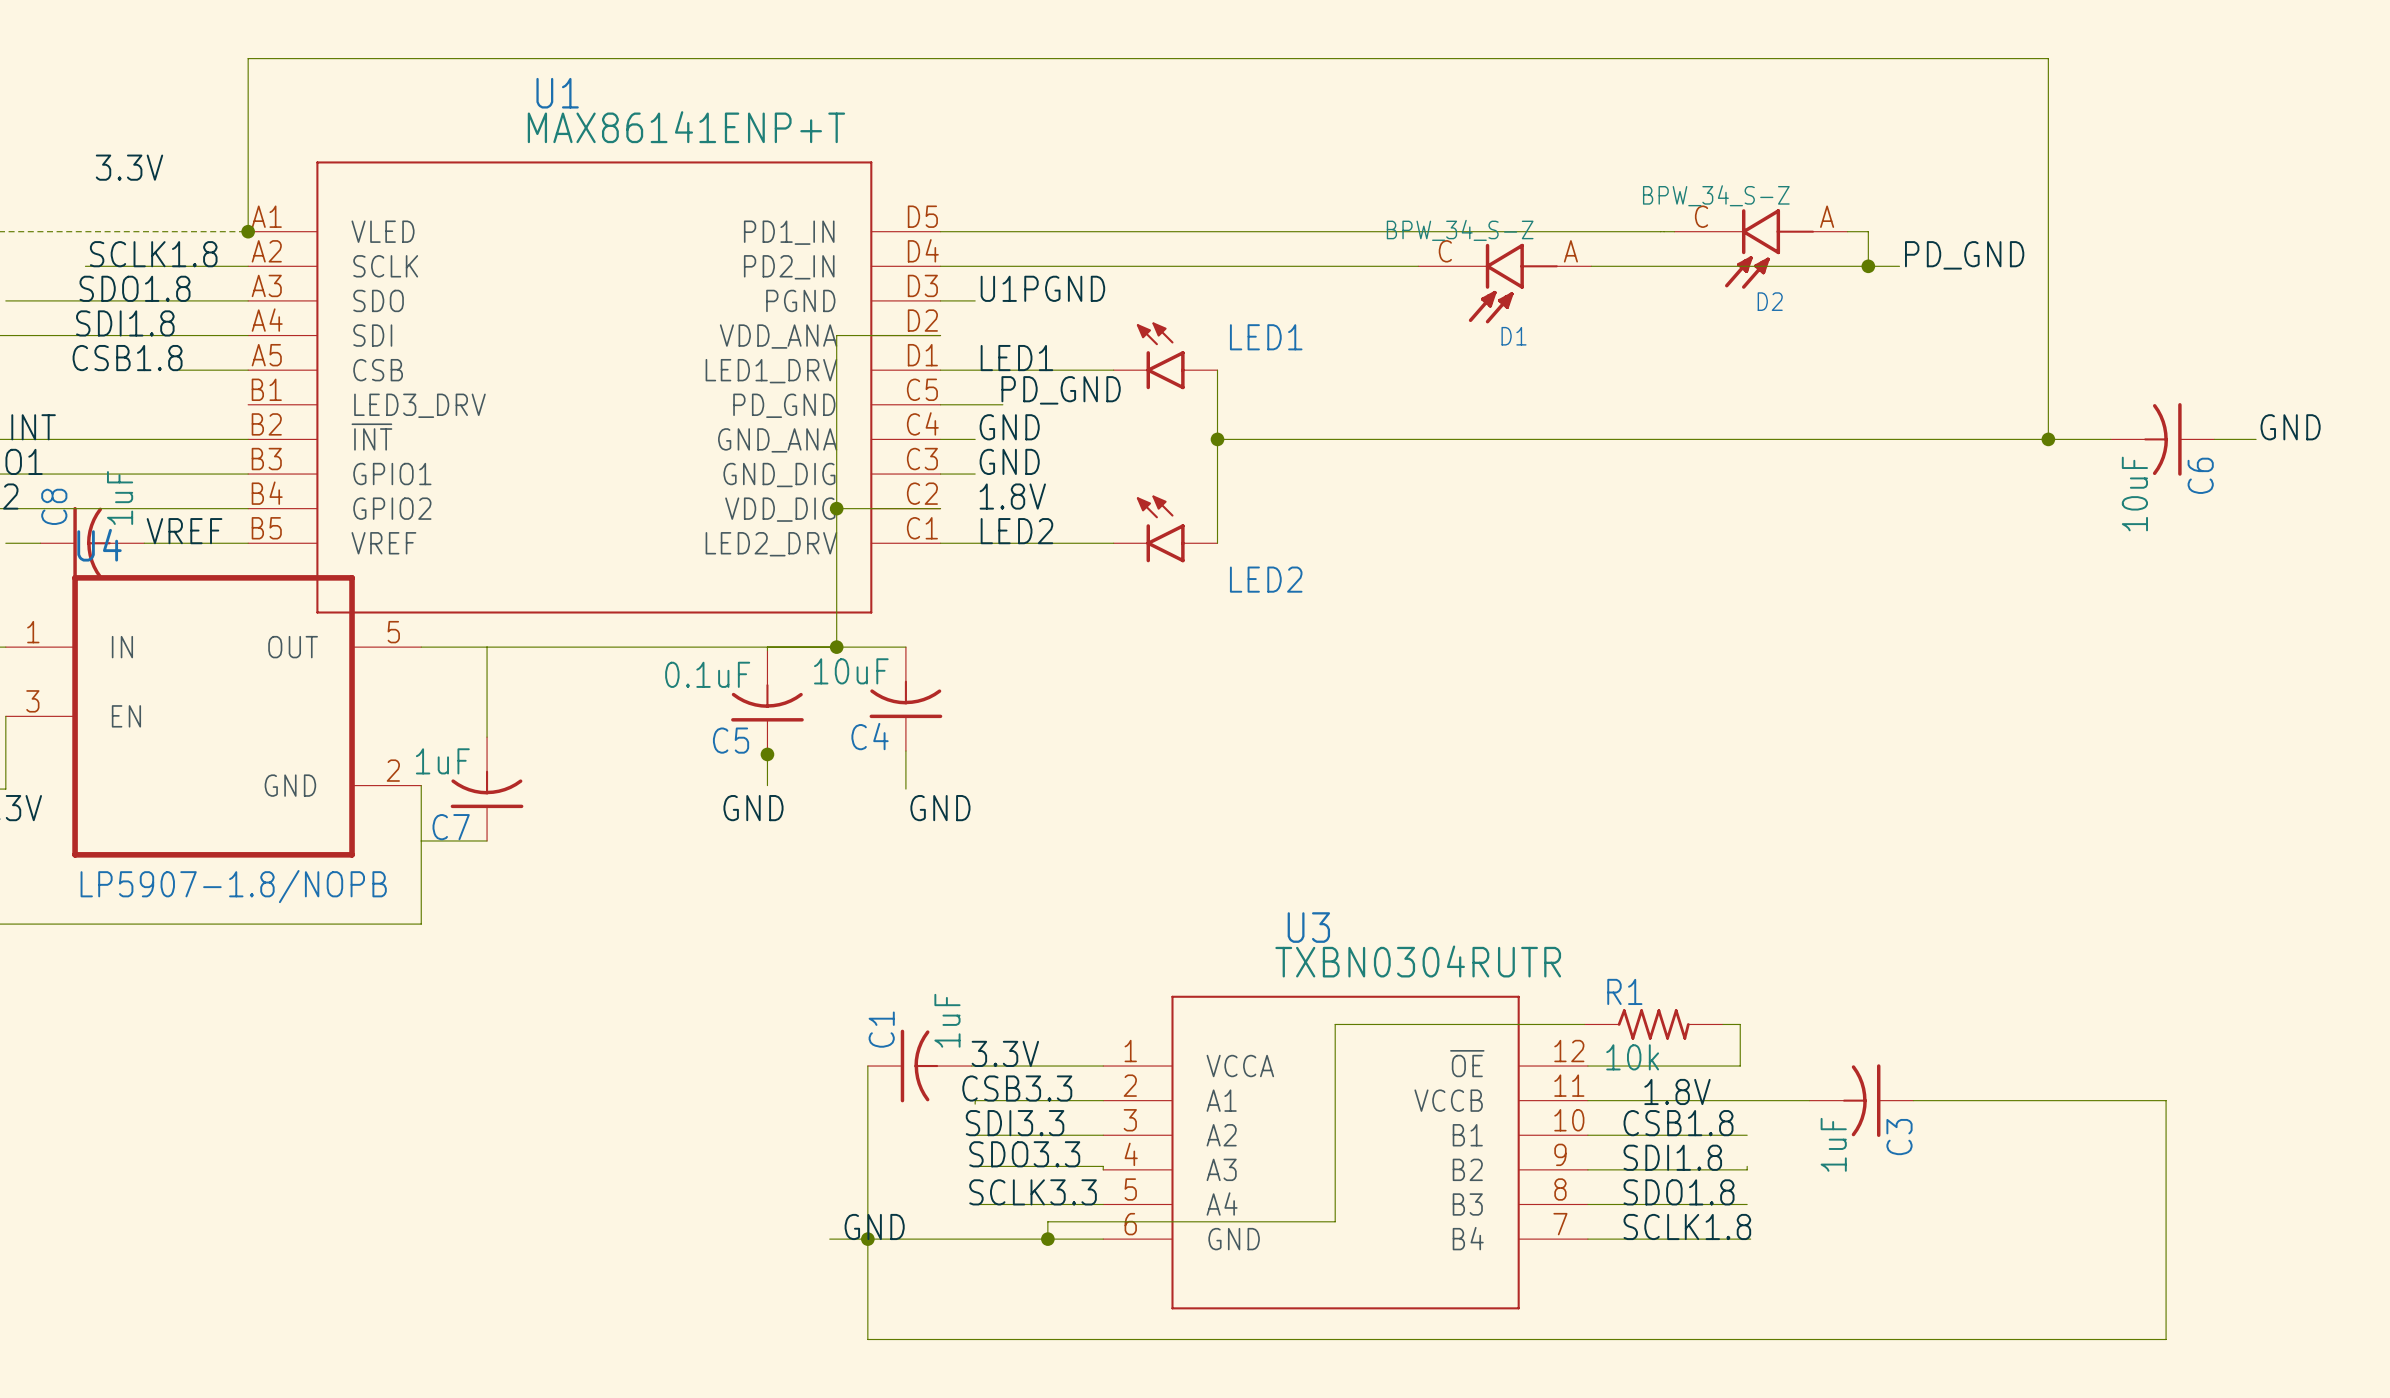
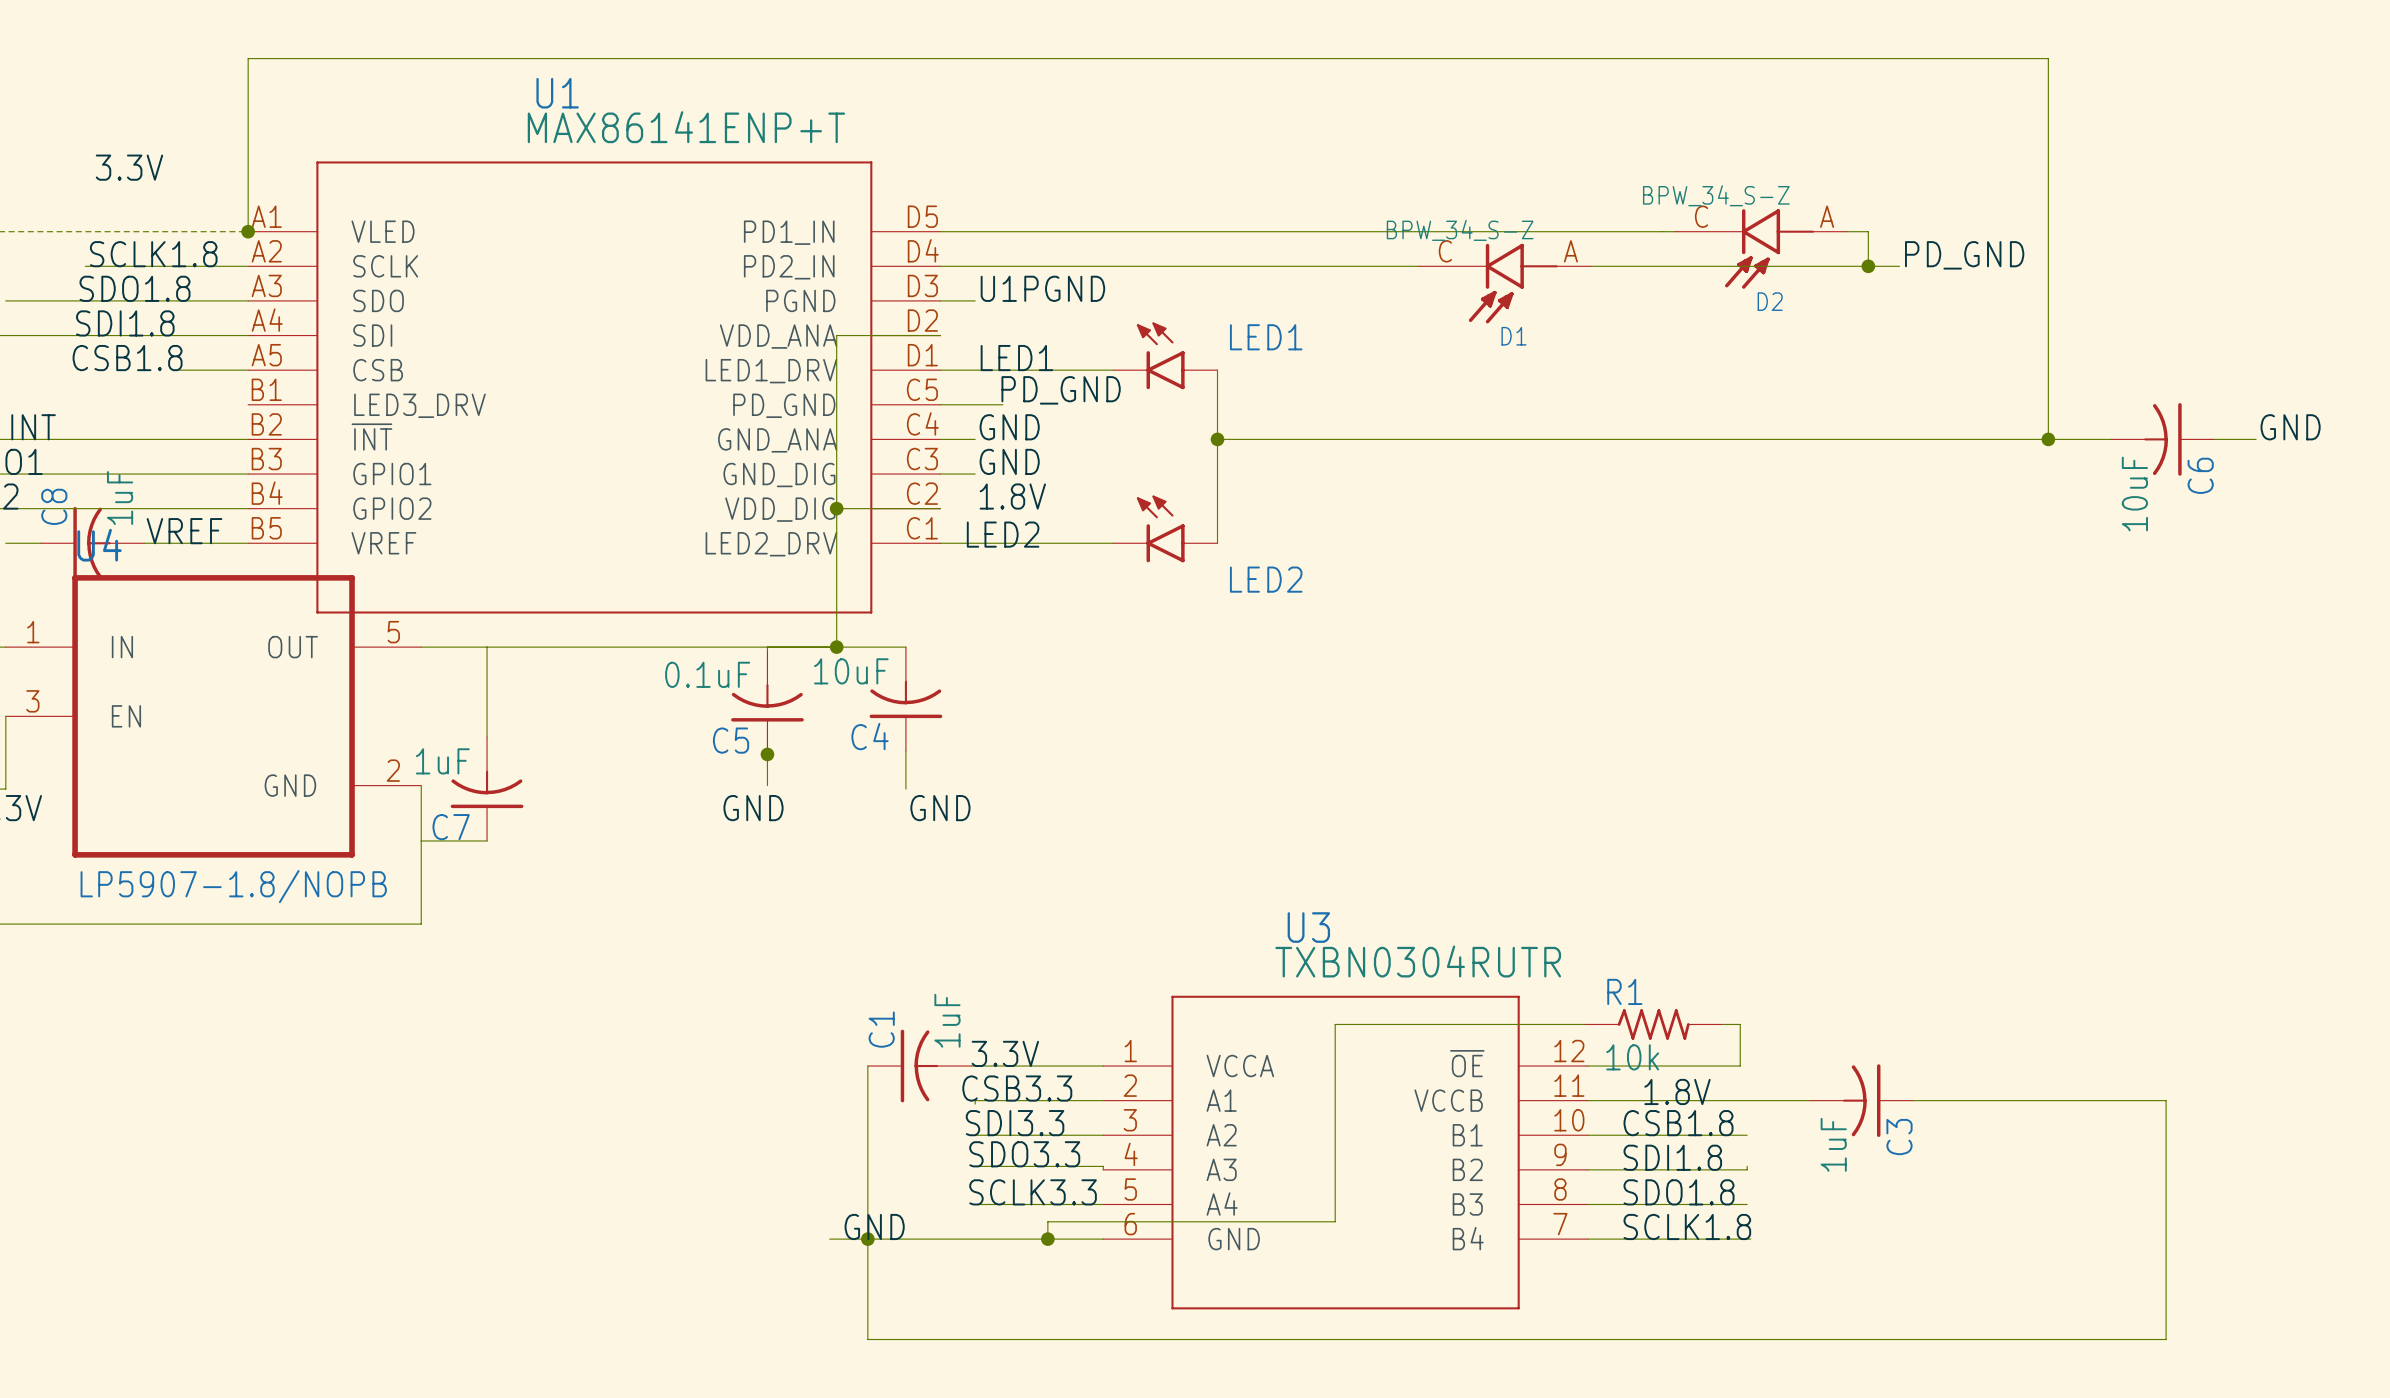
label position: LED2 (1016, 531) -> LED2 (1003, 534)

